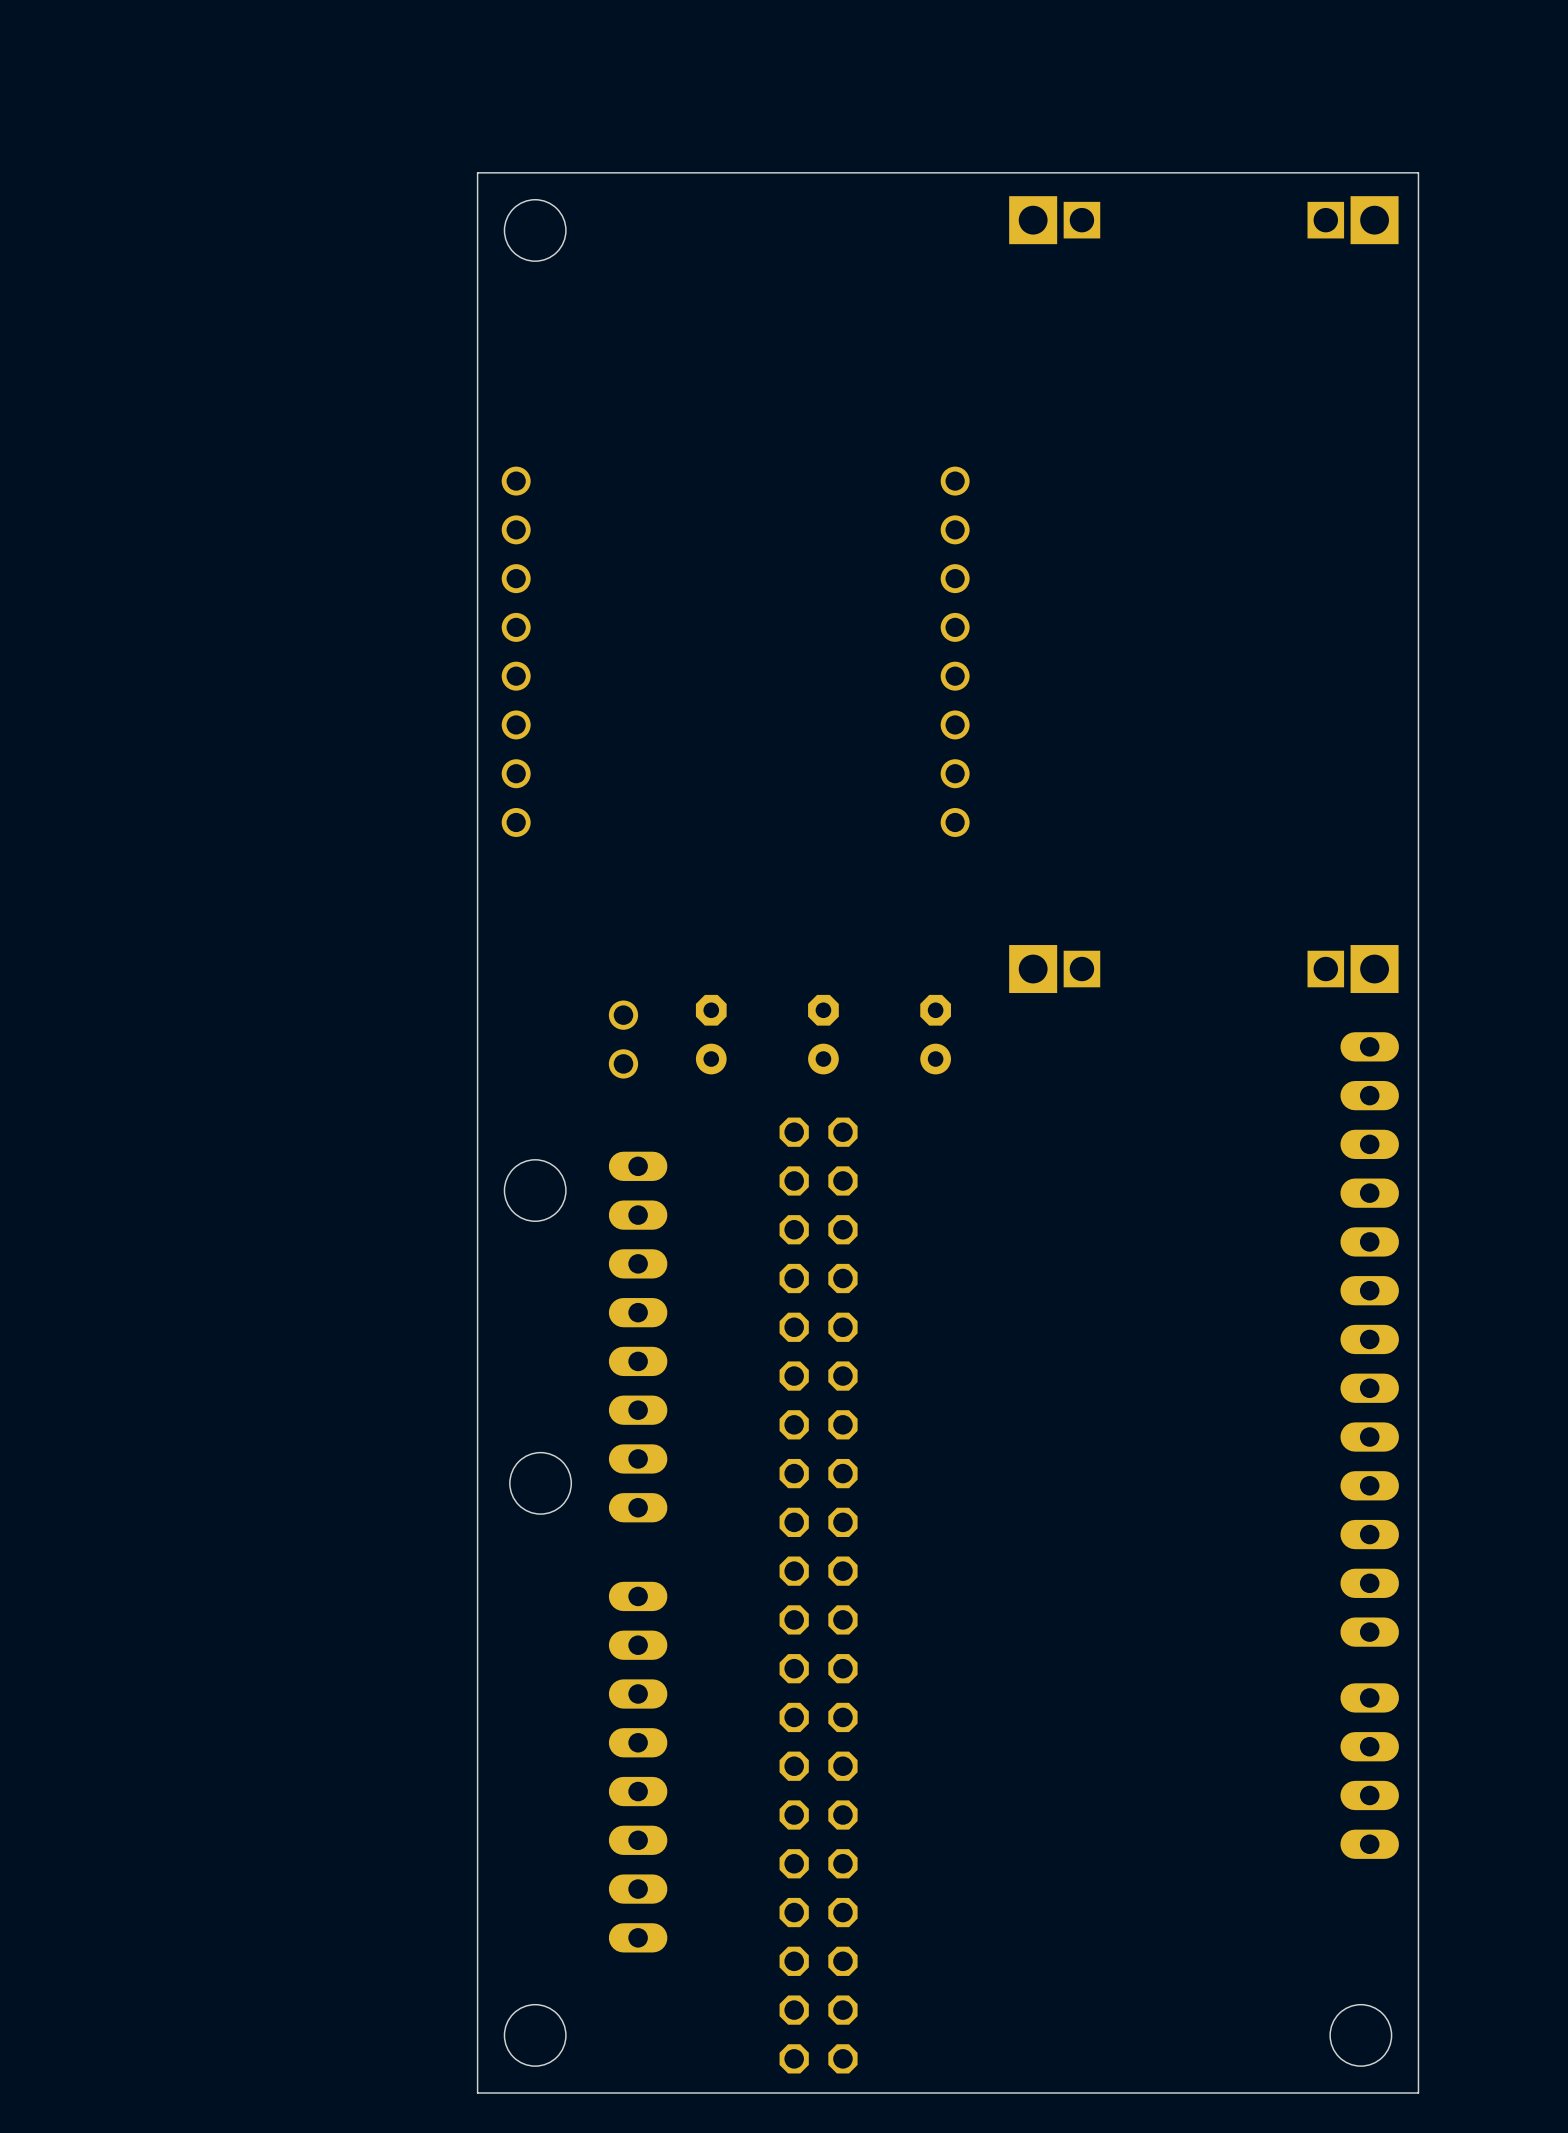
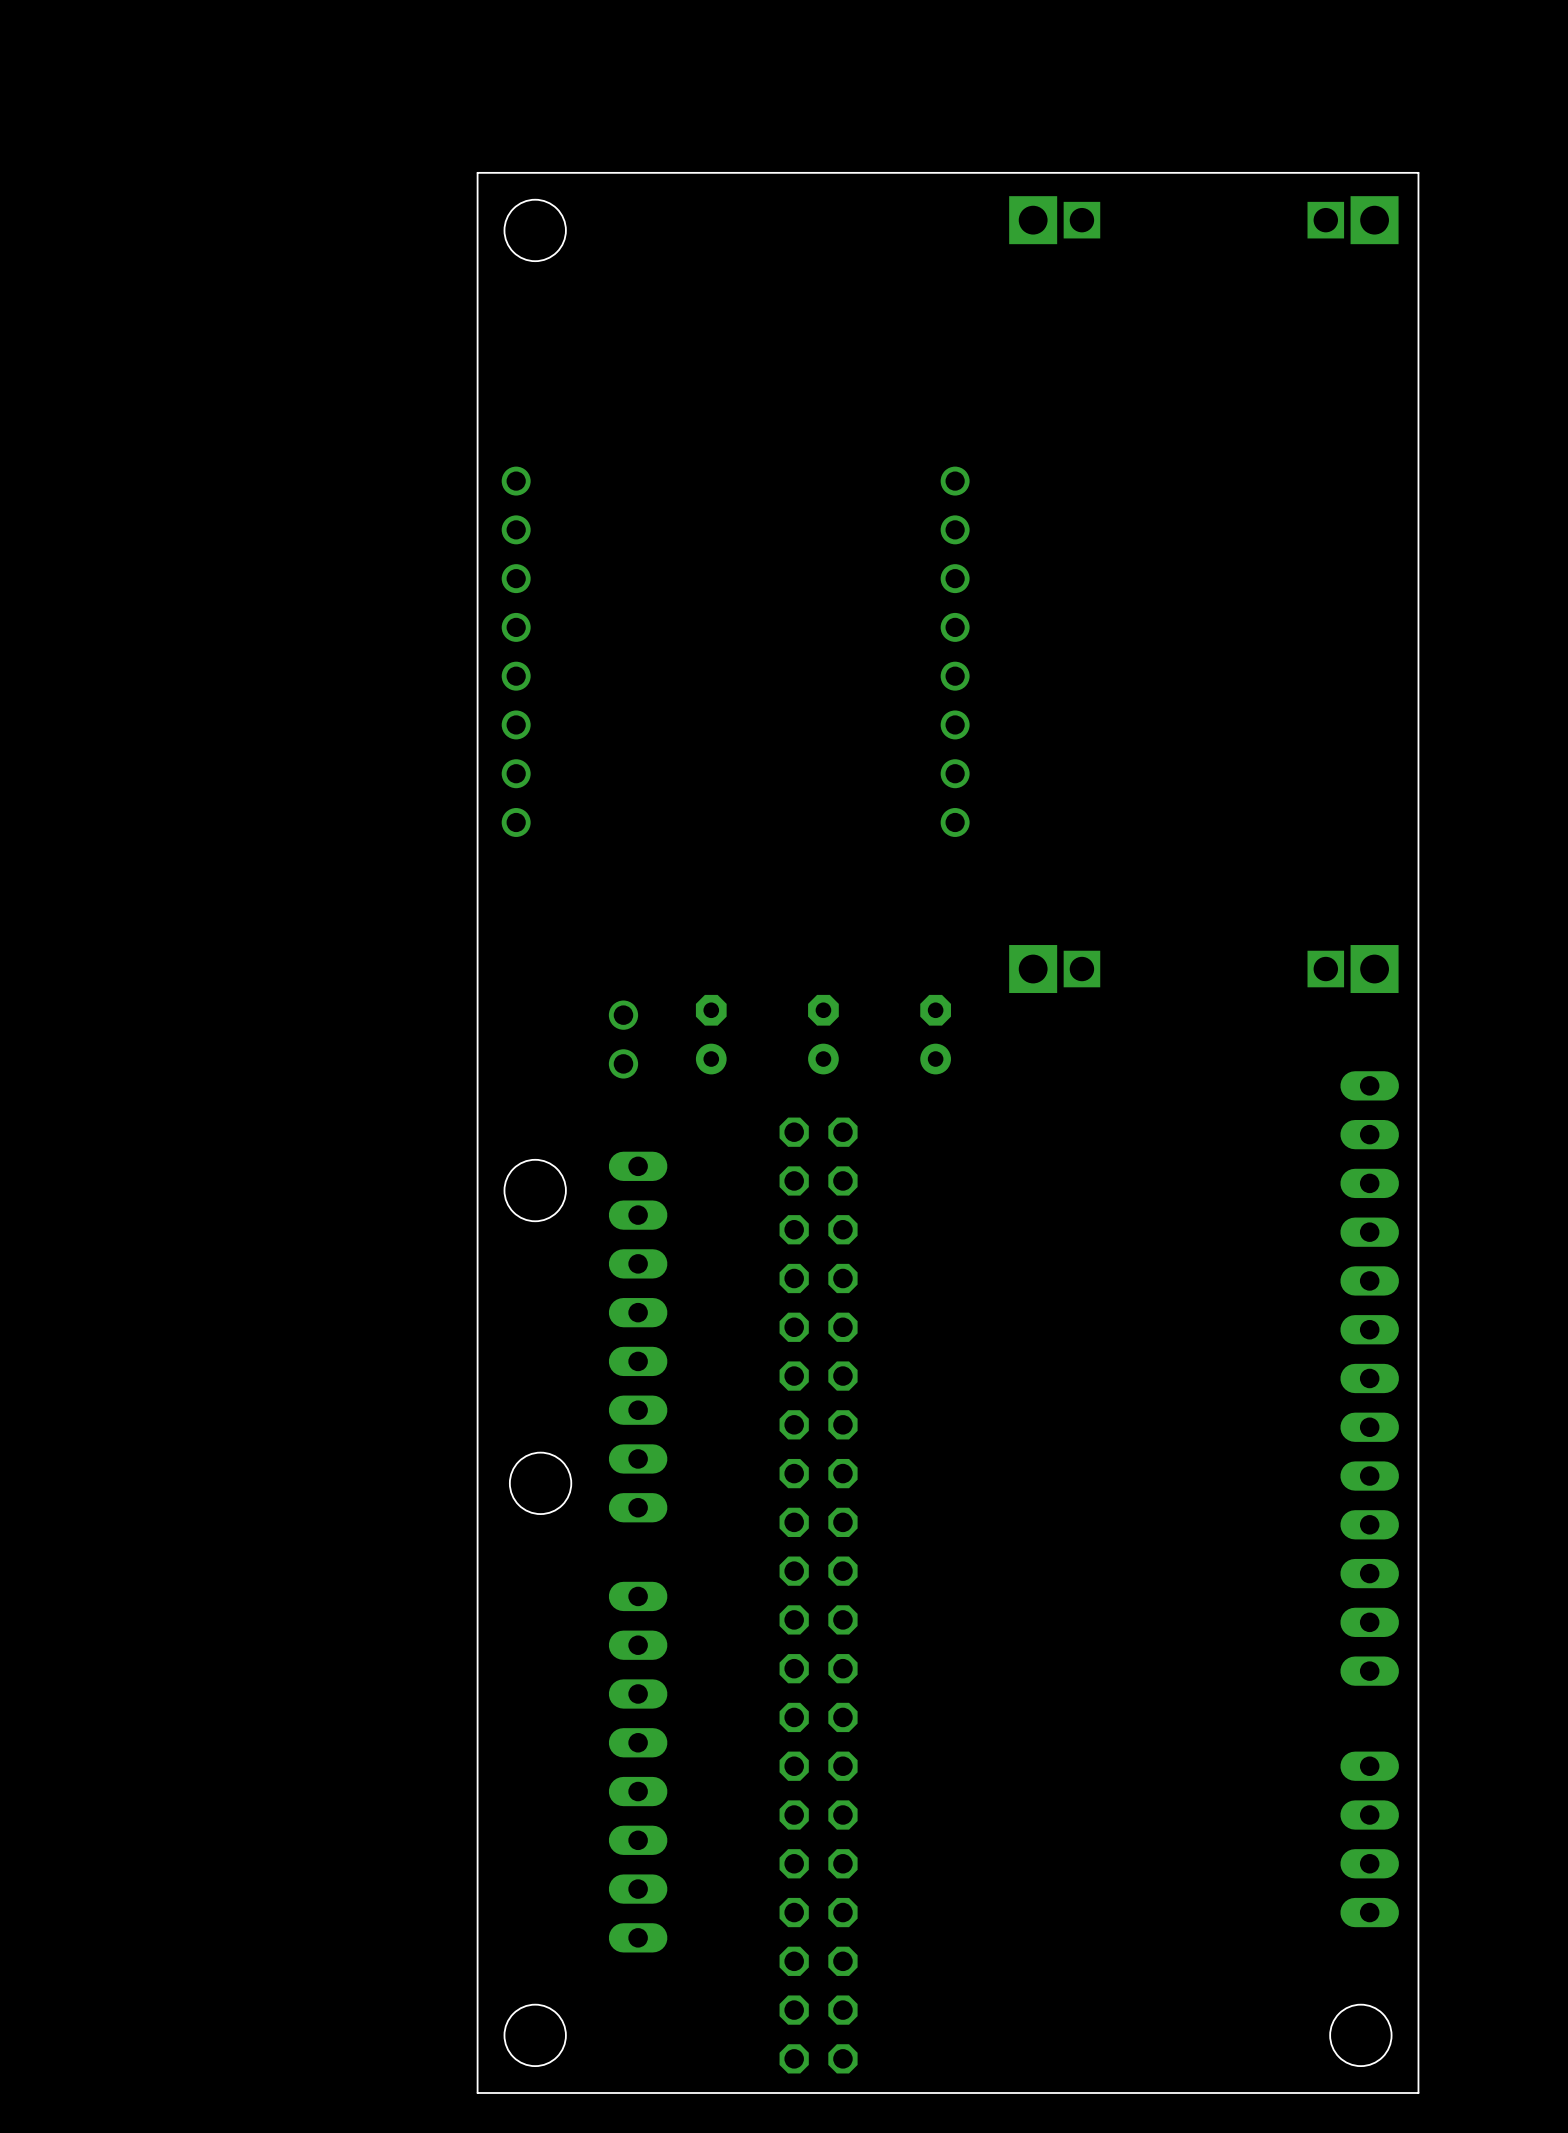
part position: (1369, 1339) -> (1369, 1378)
part position: (1369, 1771) -> (1369, 1839)

